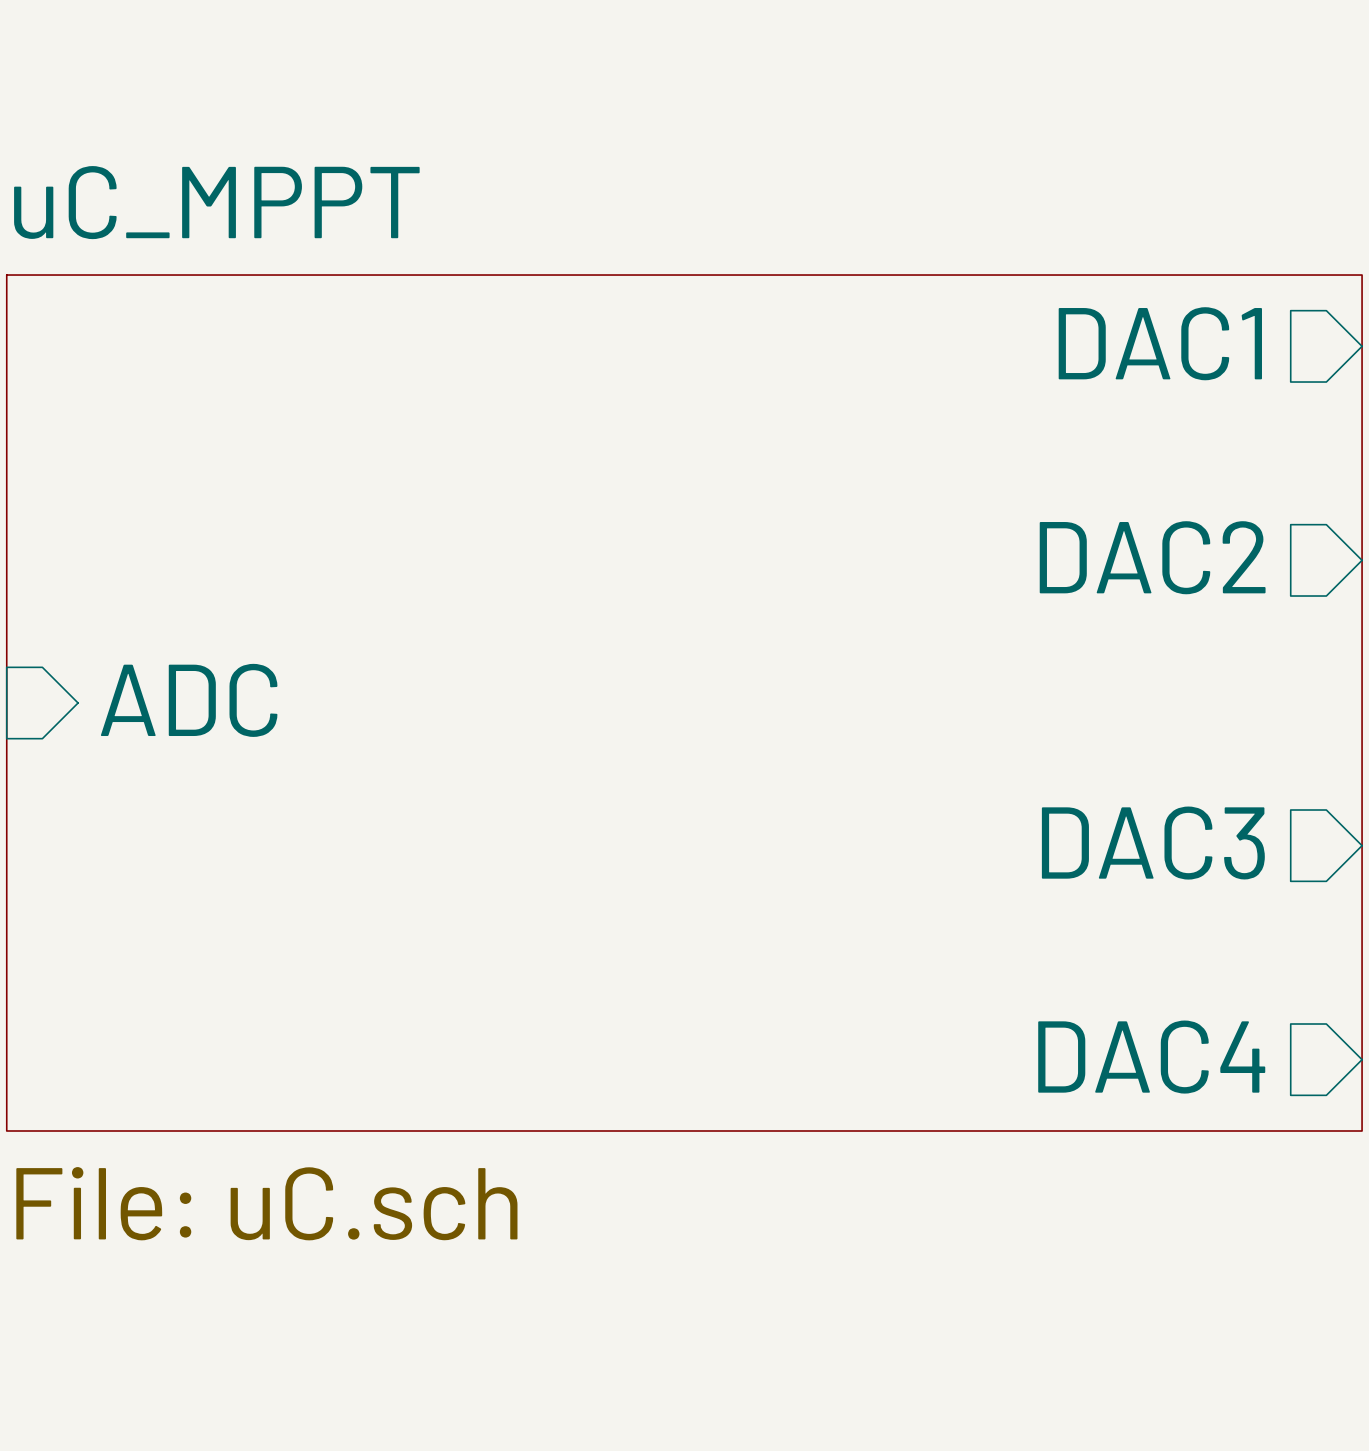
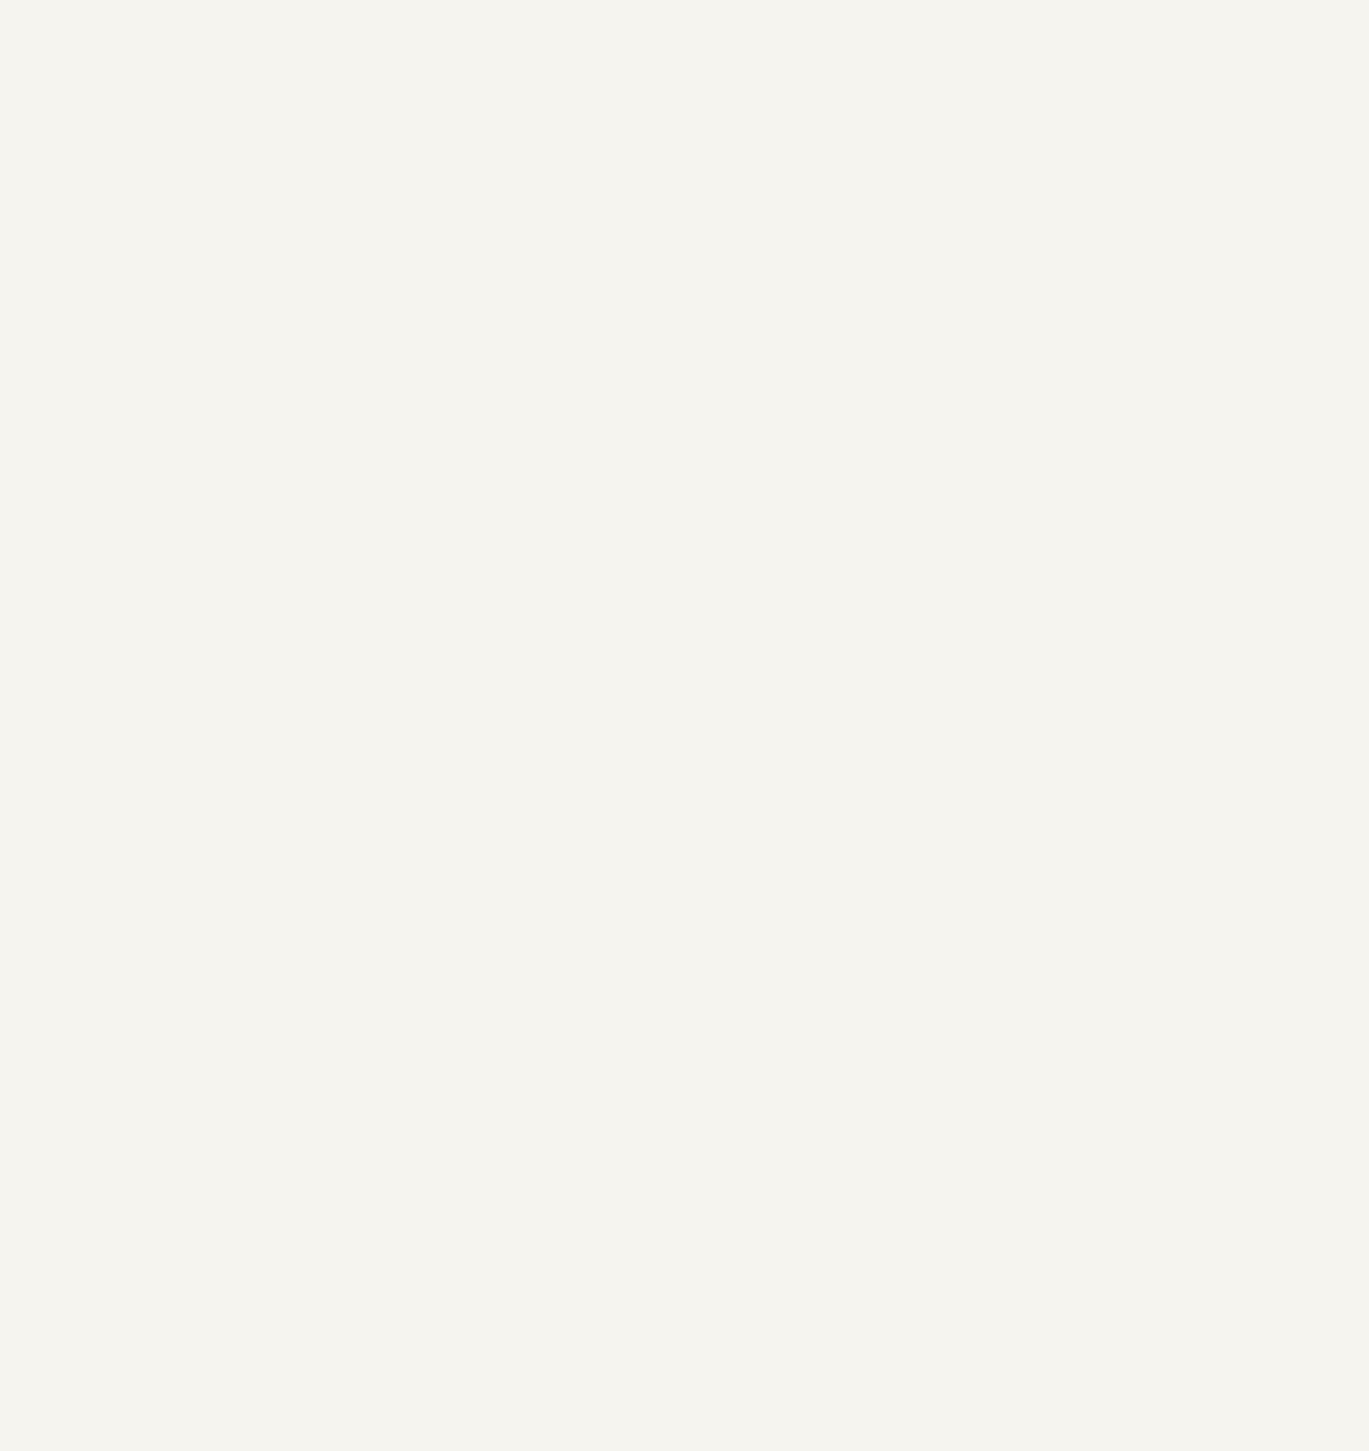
sheet pin: DAC1 (1160, 343) -> none
sheet pin: DAC2 (1152, 557) -> none
sheet pin: ADC (189, 700) -> none
sheet uC_MPPT: File: uC.sch (684, 703) -> none
sheet pin: DAC3 (1153, 843) -> none
sheet pin: DAC4 (1151, 1057) -> none

